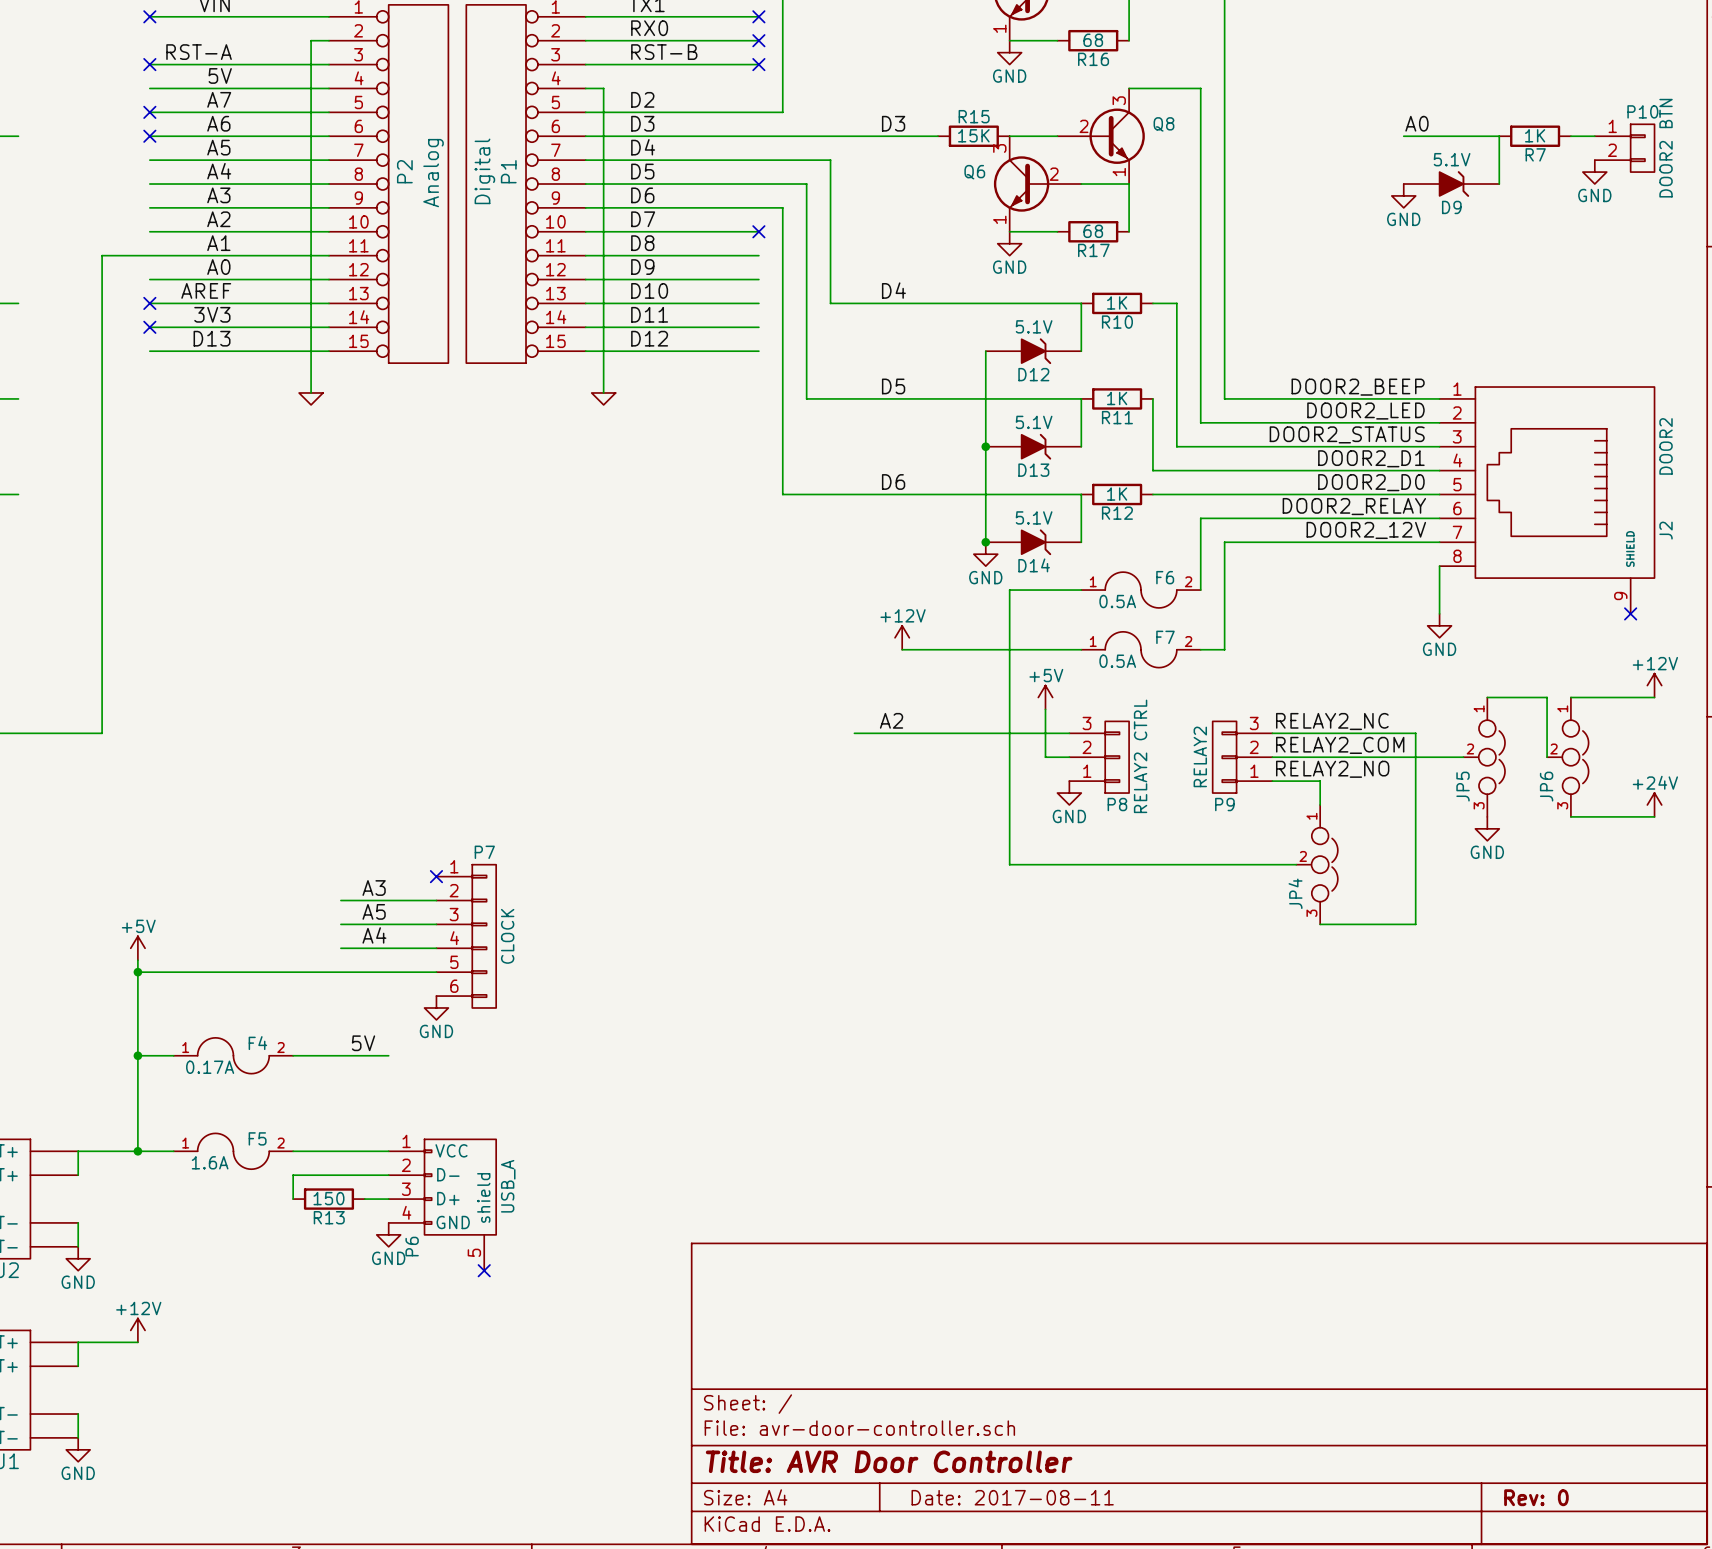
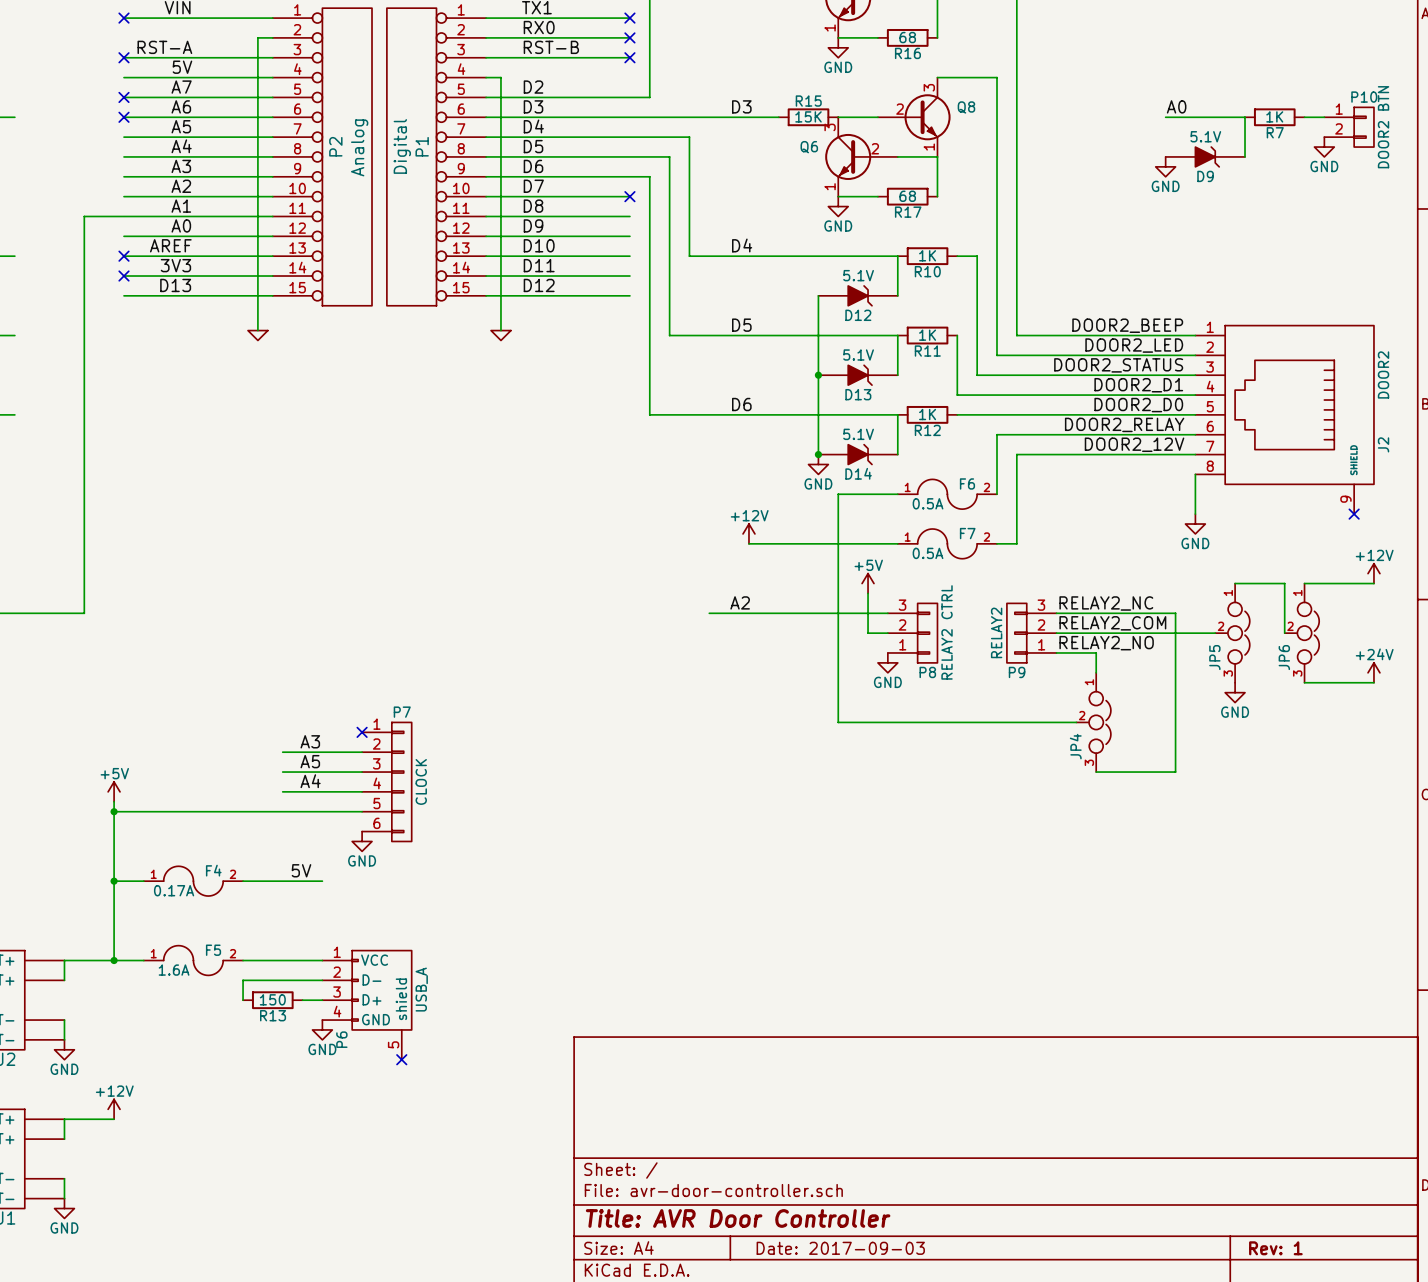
title block: Date: 2017-08-11 (1012, 1497) -> Date: 2017-09-03 (840, 1248)
title block: Rev: 0 (1536, 1497) -> Rev: 1 (1275, 1248)

